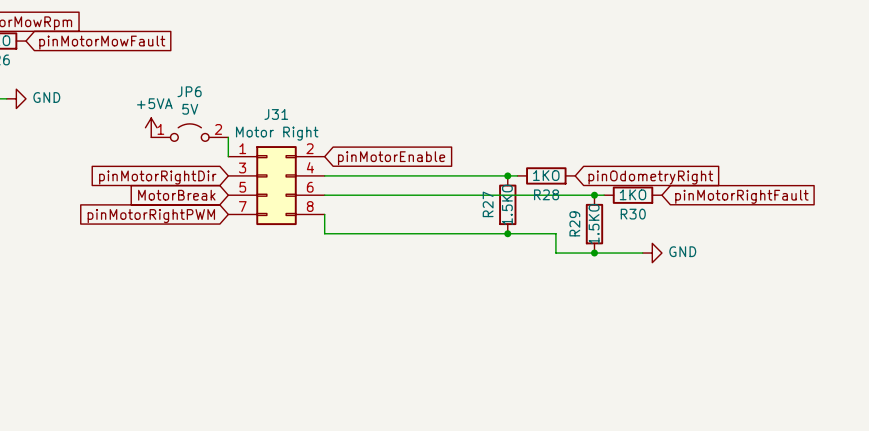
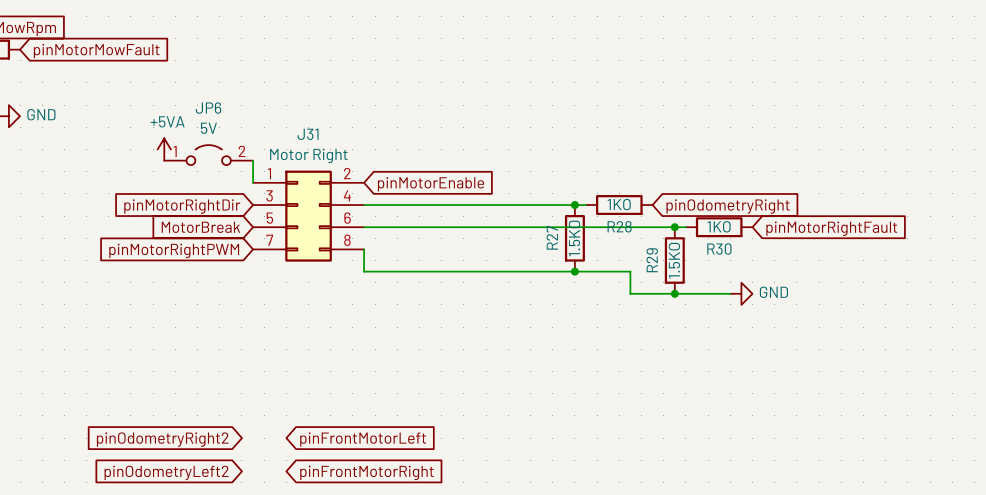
global label: none -> pinOdometryRight2 (162, 439)
global label: none -> pinFrontMotorLeft (363, 439)
global label: none -> pinOdometryLeft2 (166, 472)
global label: none -> pinFrontMotorRight (366, 472)

